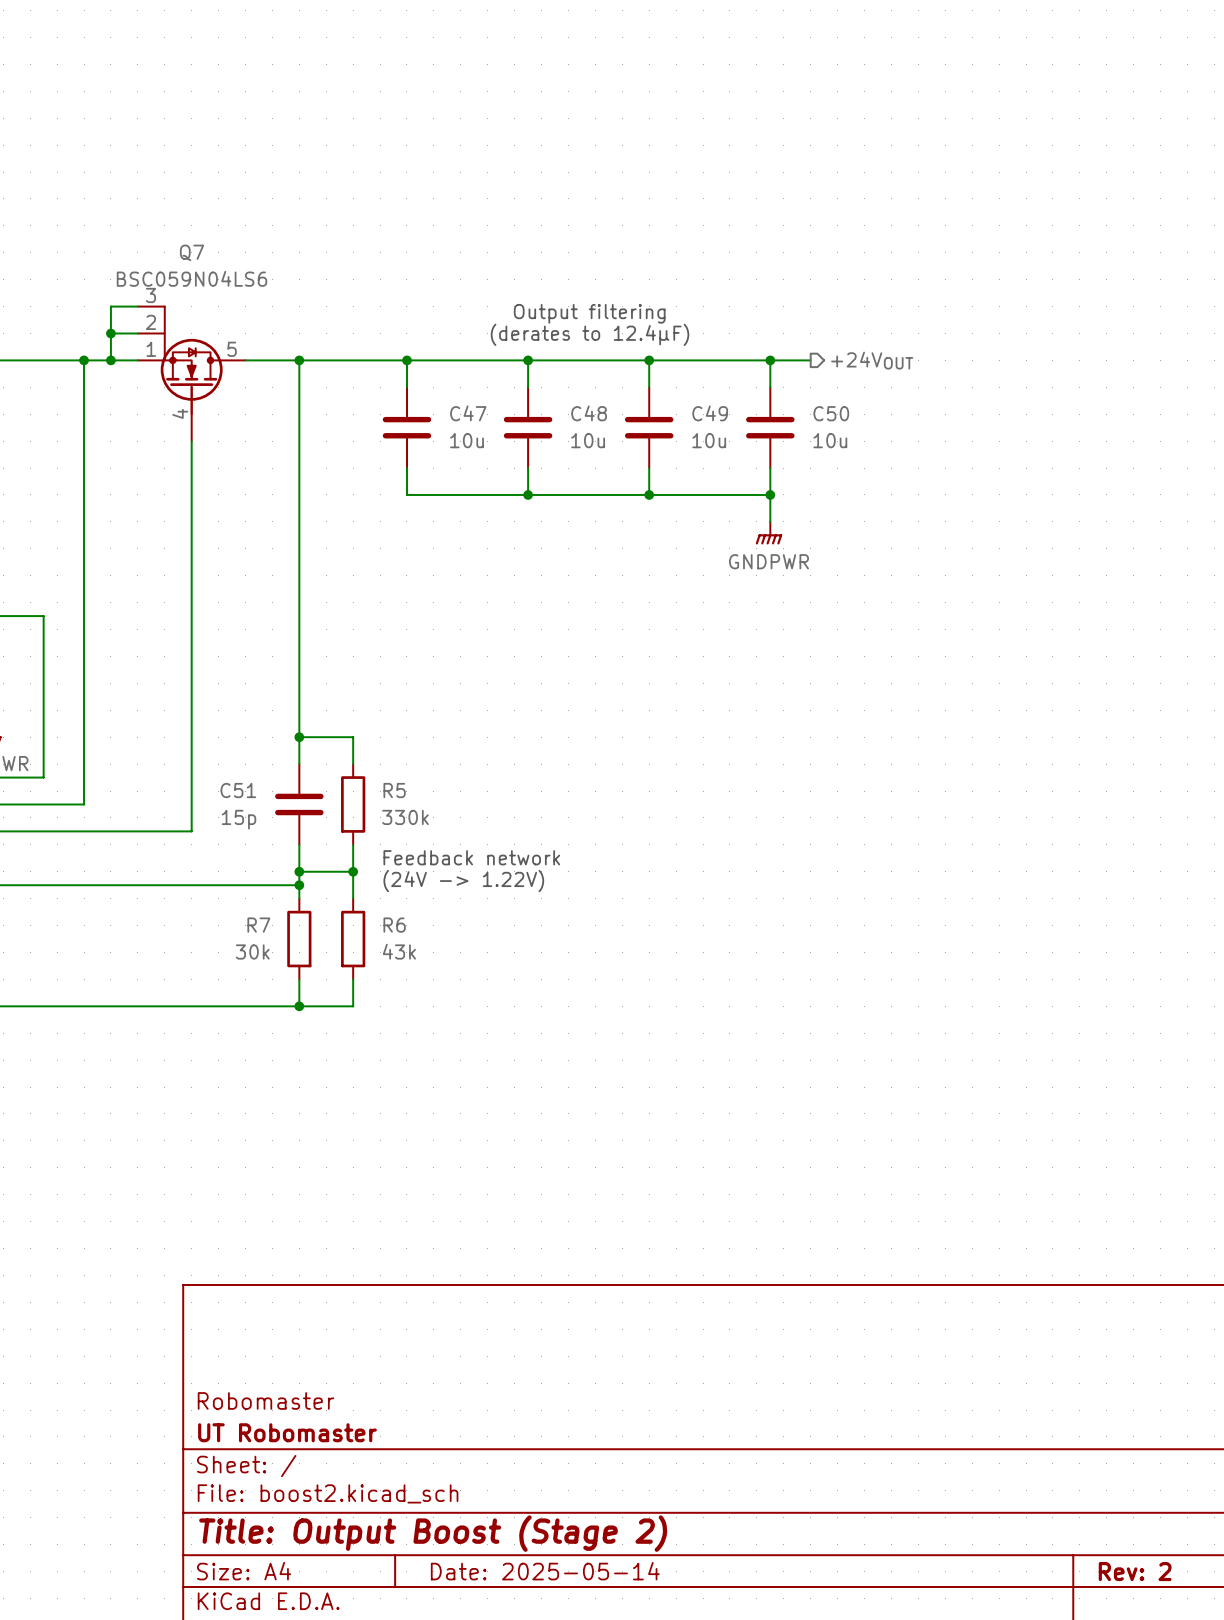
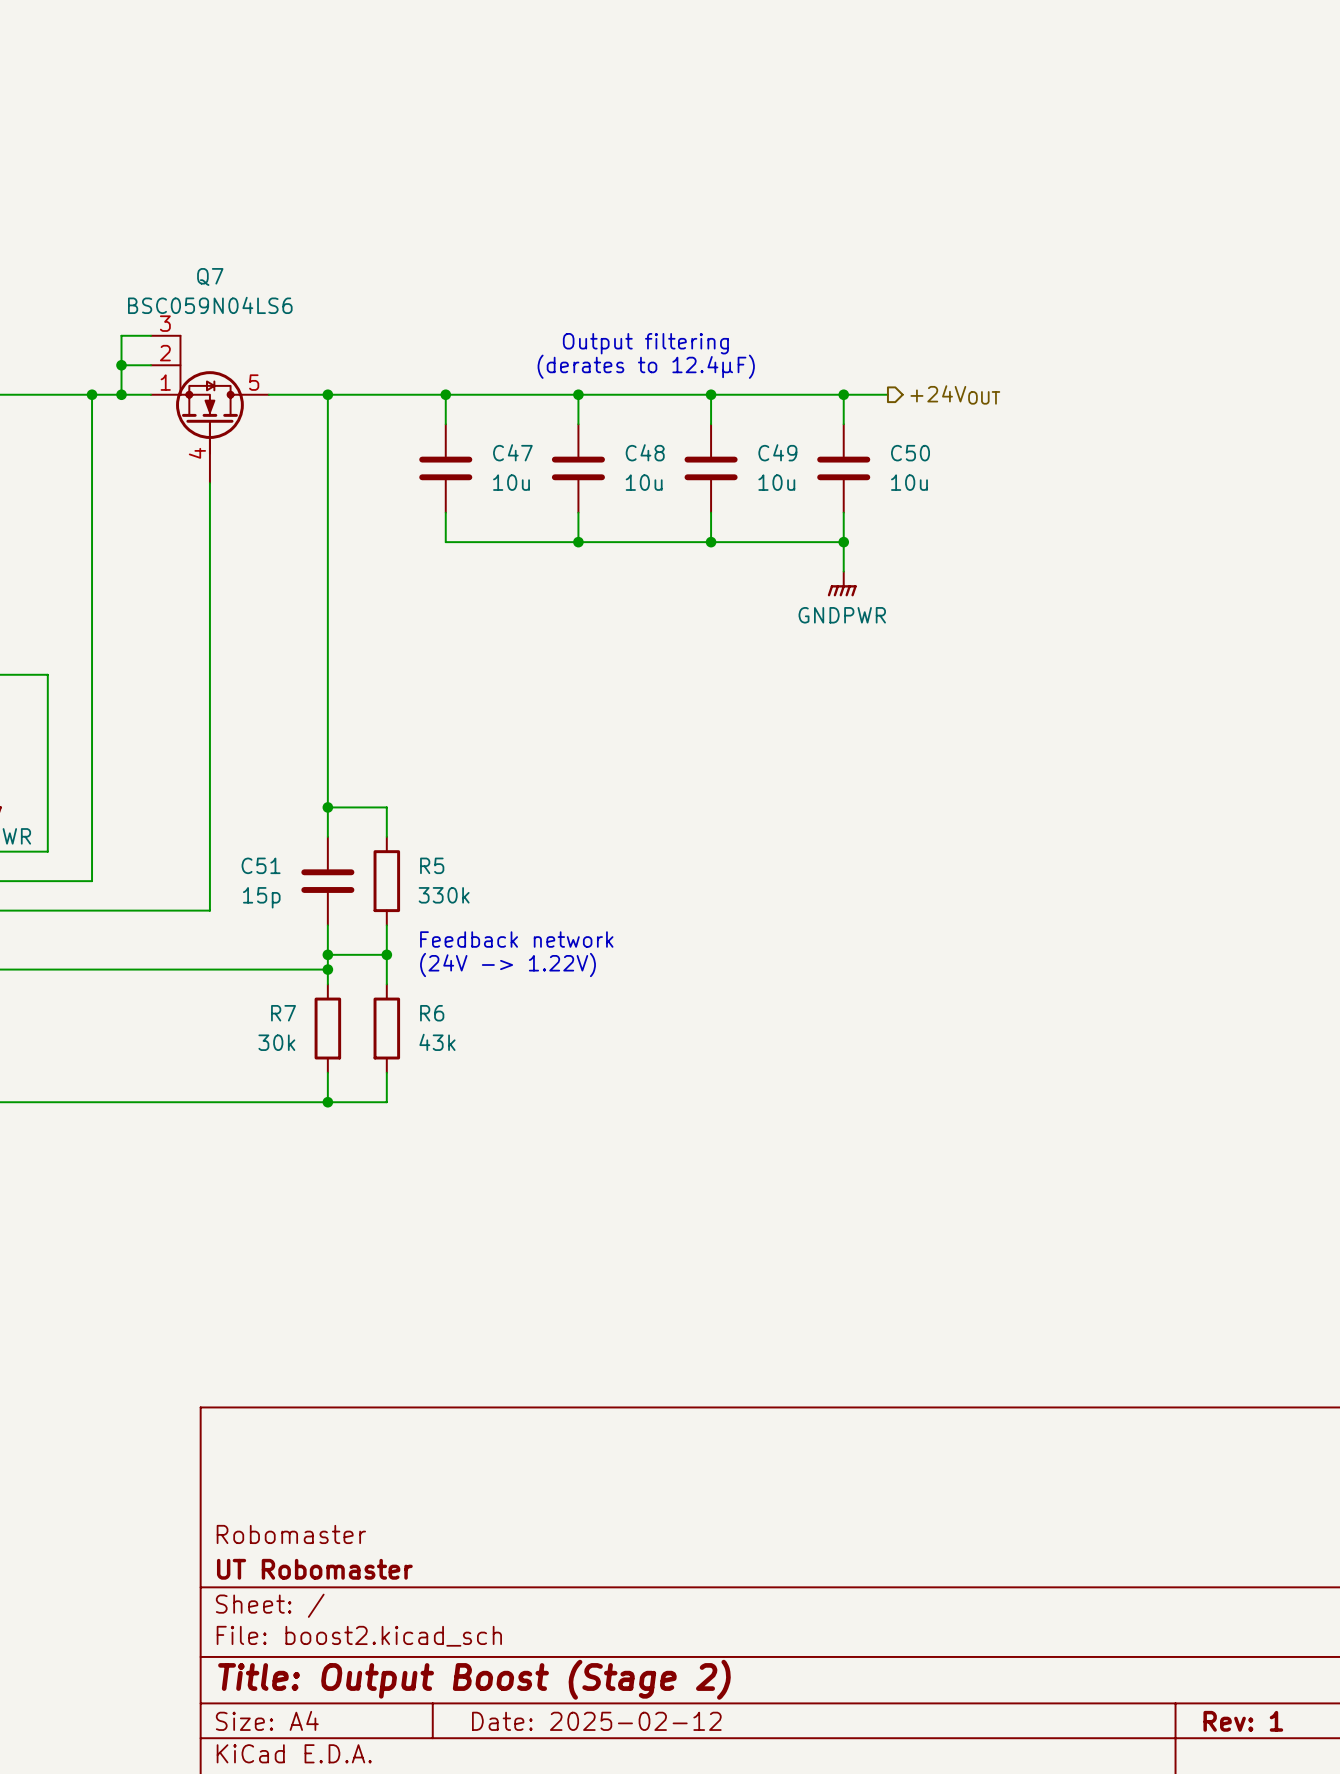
title block: Date: 2025-05-14 (545, 1571) -> Date: 2025-02-12 (596, 1721)
title block: Rev: 2 (1135, 1571) -> Rev: 1 (1243, 1721)

